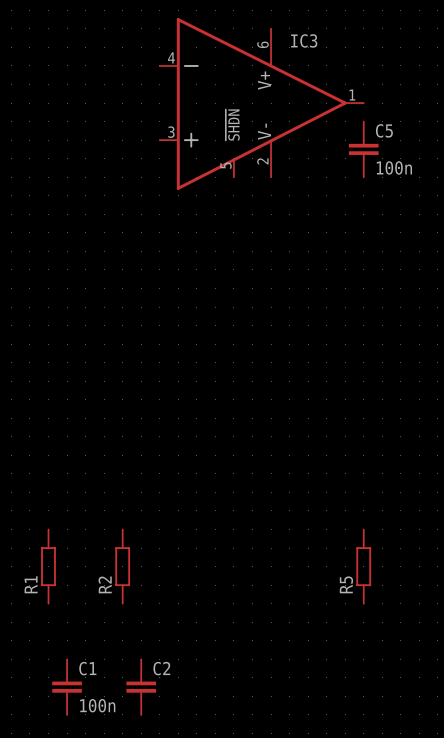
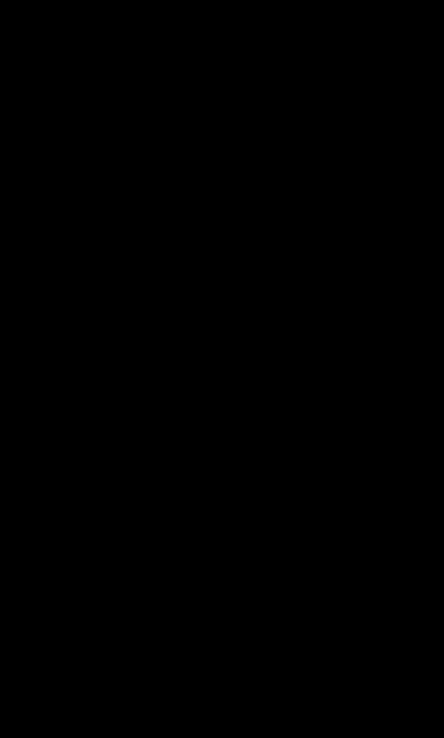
IC3: (261, 103) -> none
C5: 100n (363, 149) -> none
R1: (48, 566) -> none
R2: (122, 566) -> none
R5: (363, 566) -> none
C1: 100n (67, 687) -> none
C2: (141, 687) -> none

